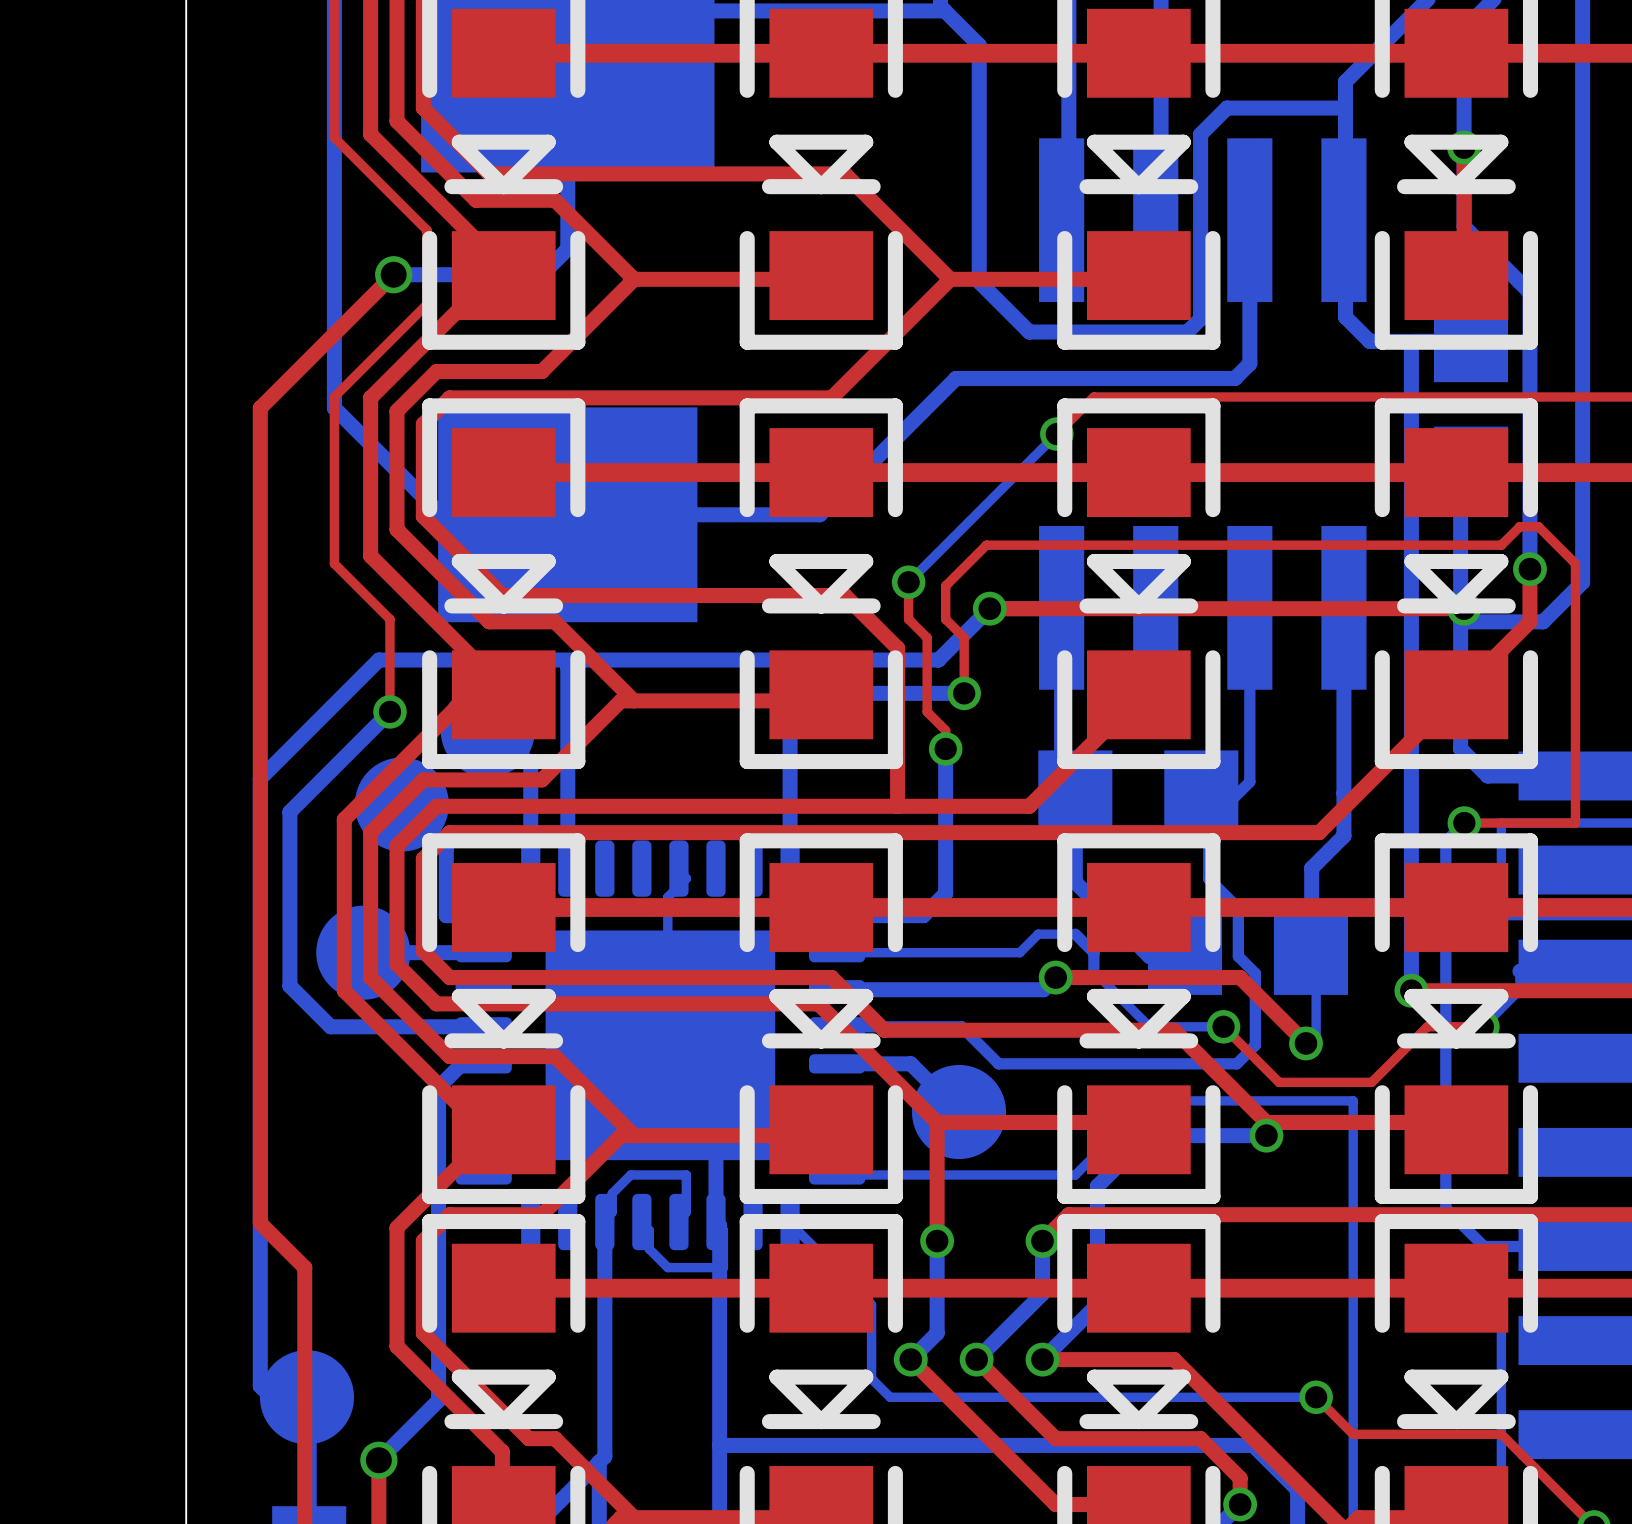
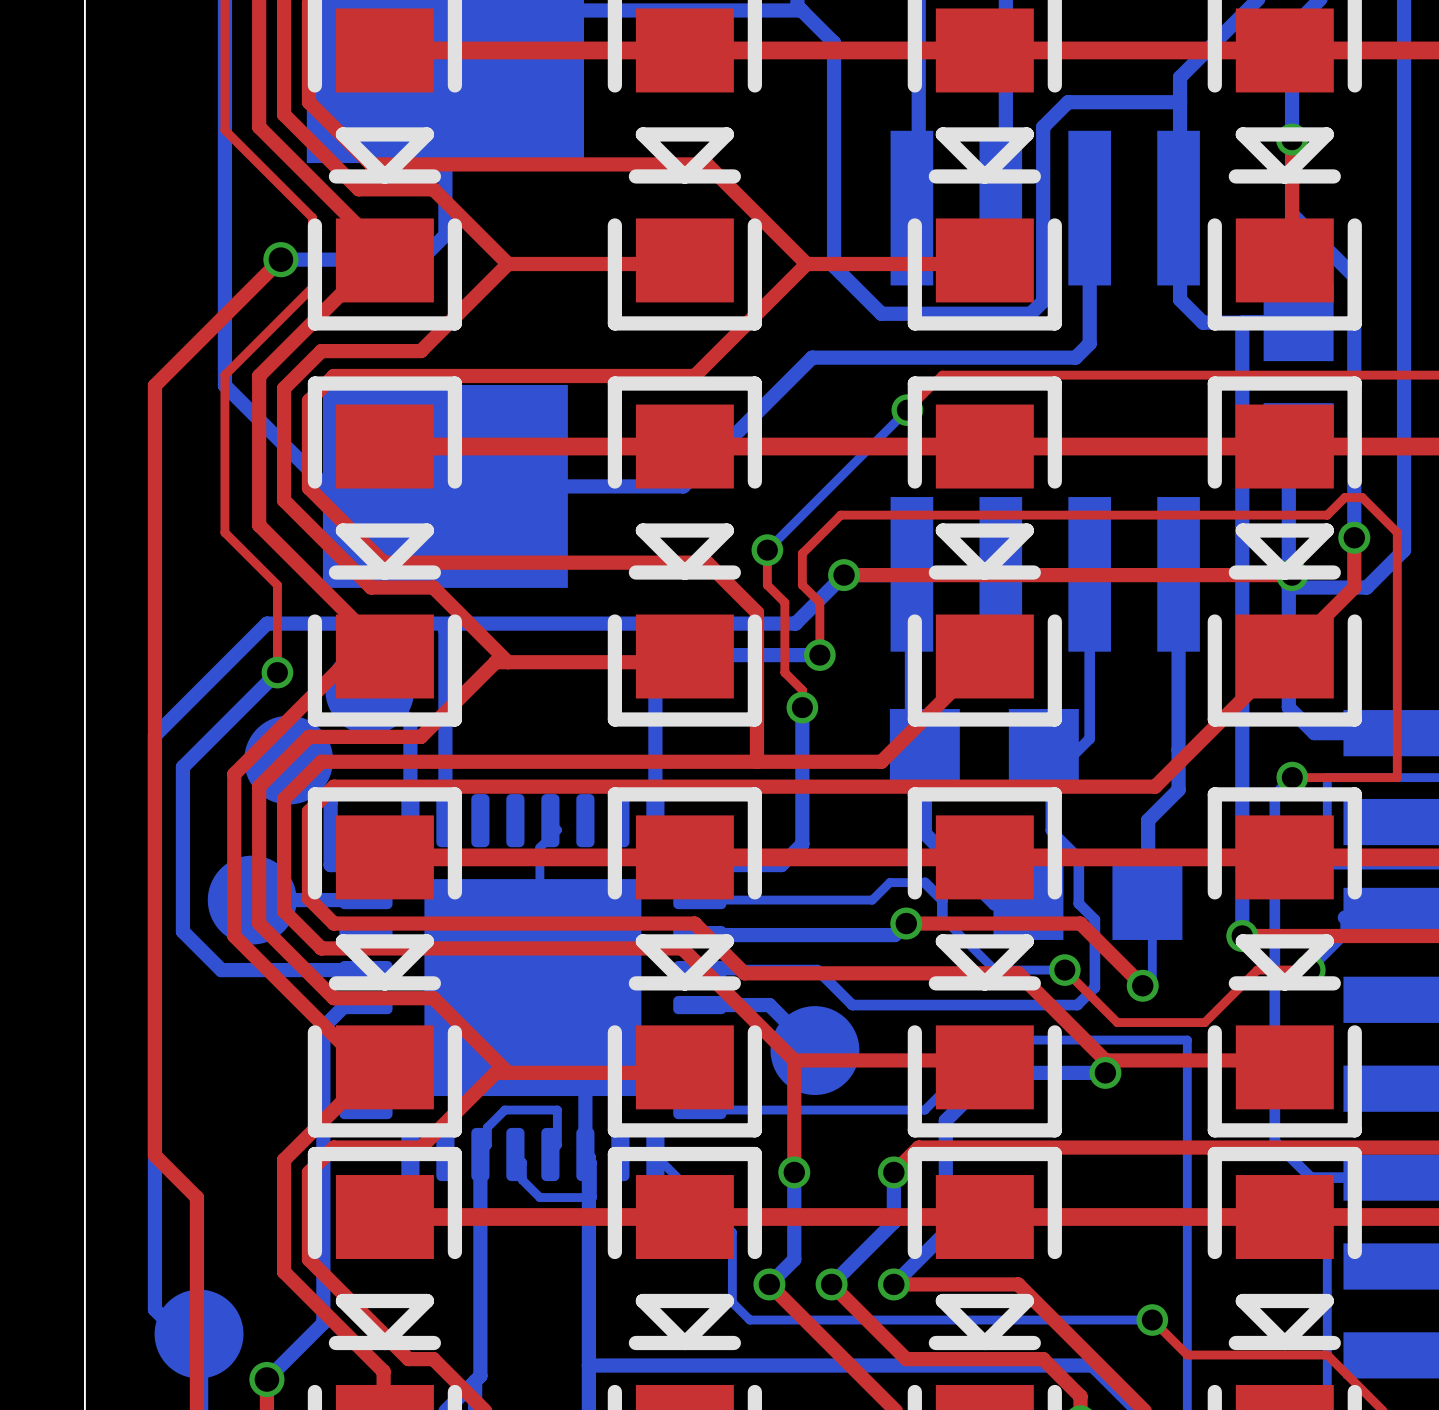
part position: (306, 1397) -> (199, 1334)

